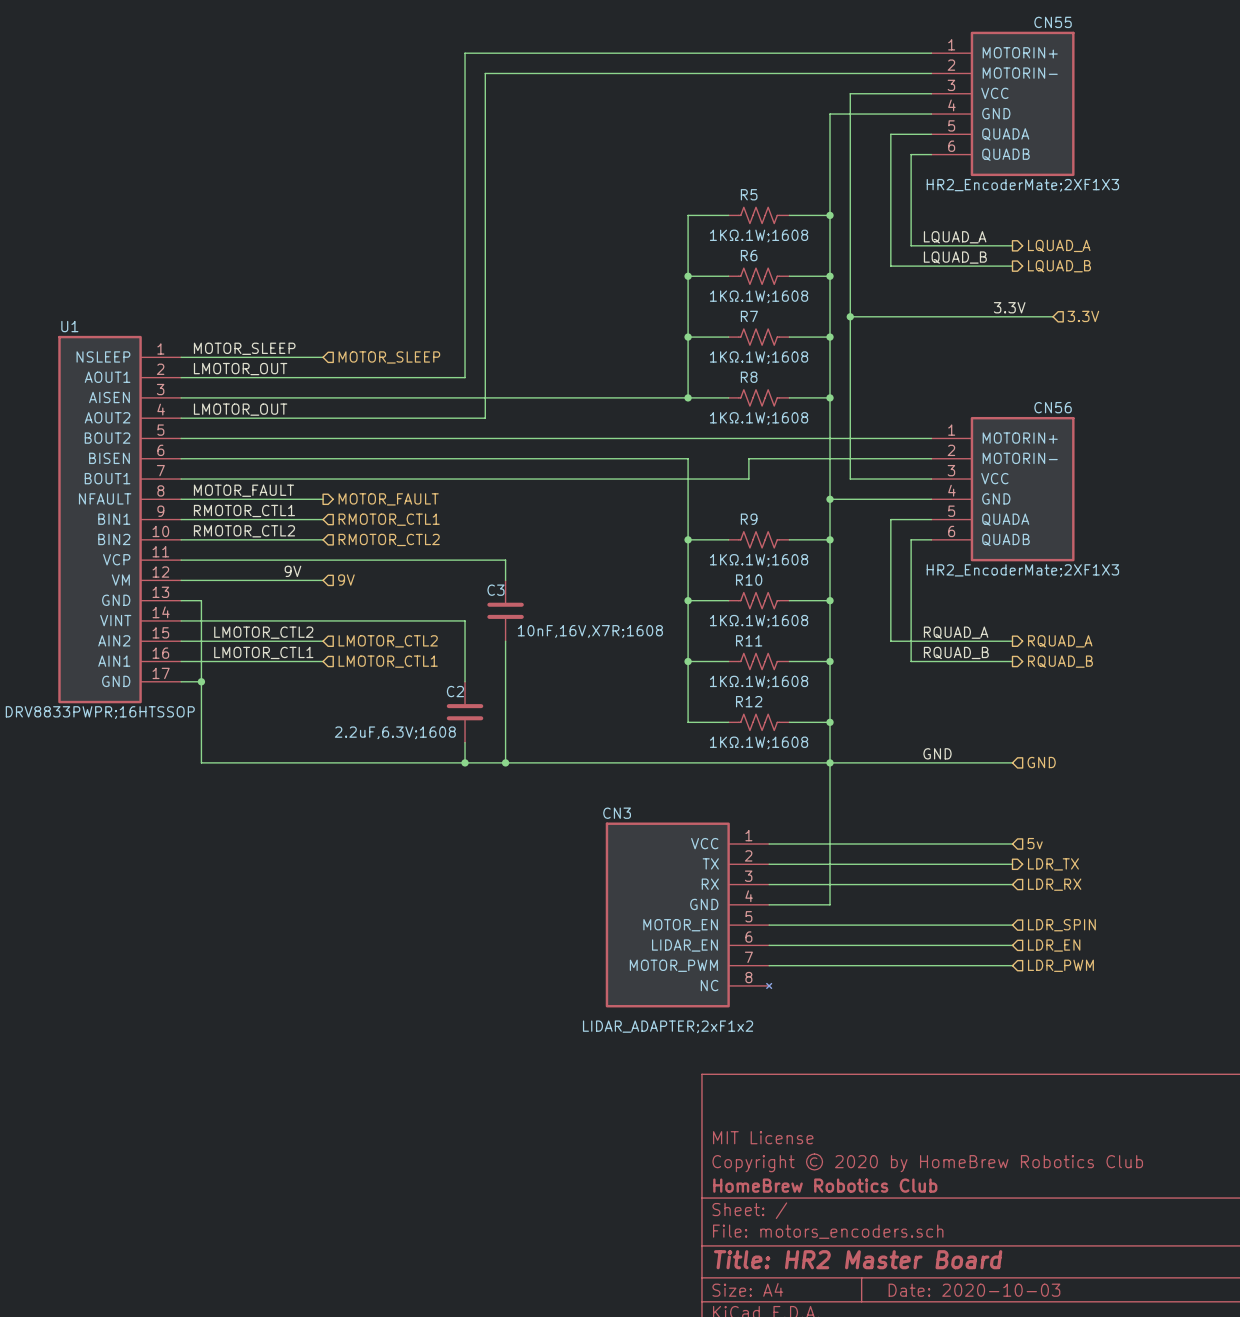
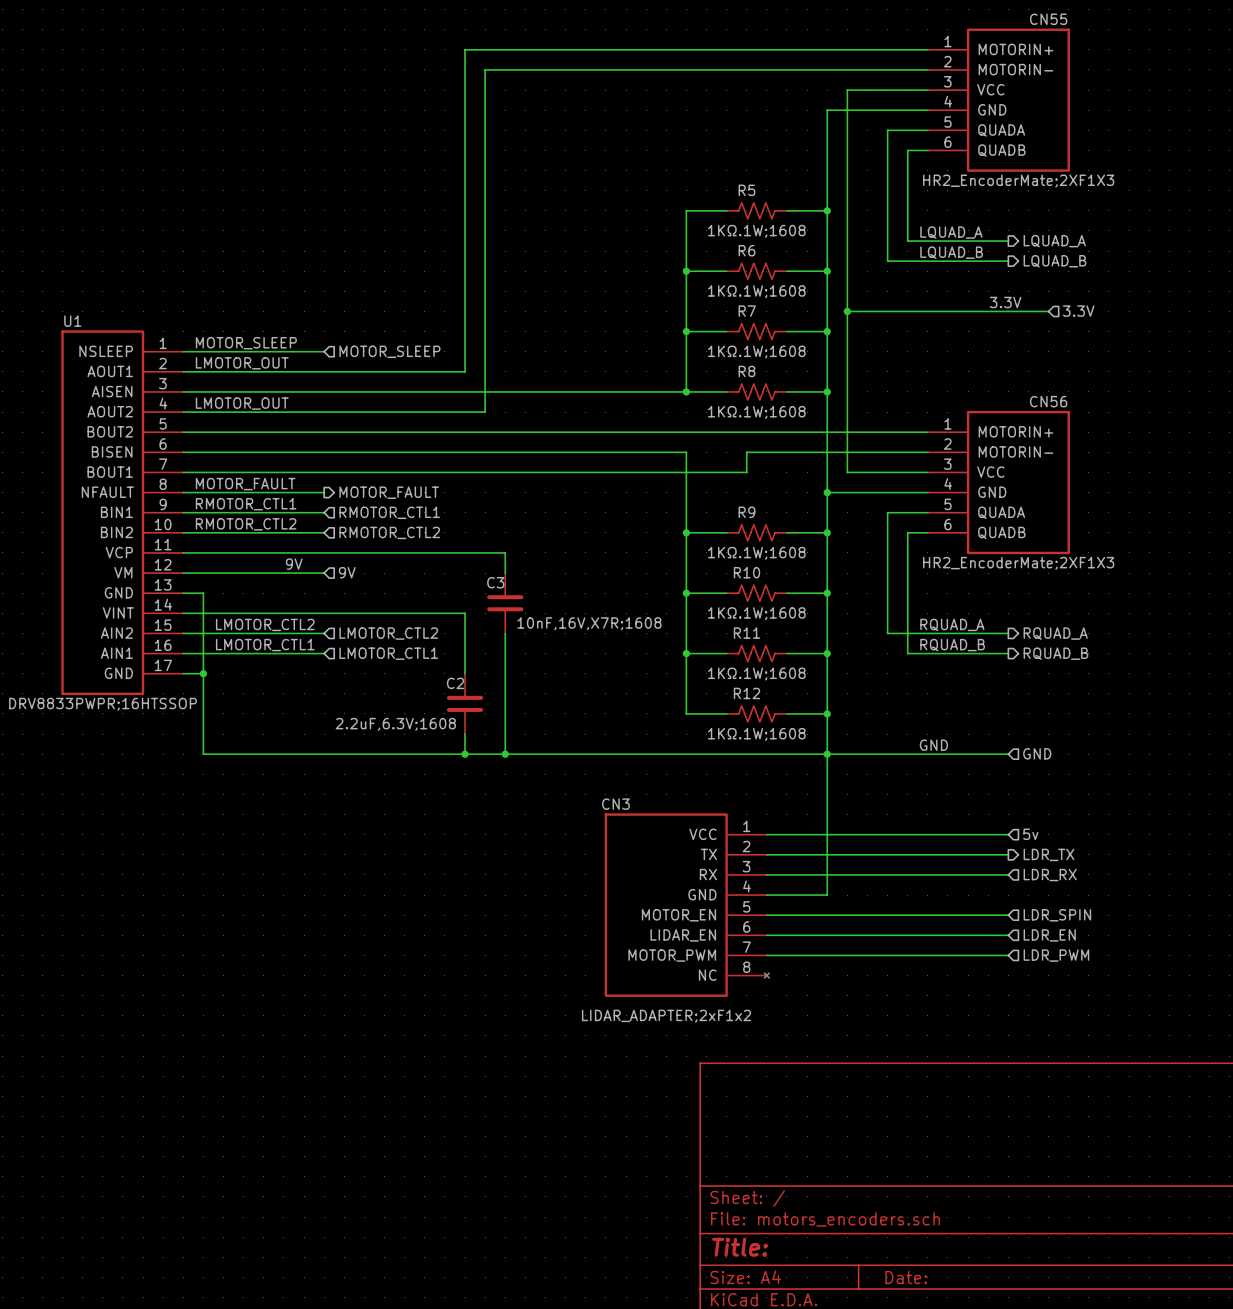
title block: MIT License (763, 1137) -> none
title block: Copyright © 2020 by HomeBrew Robotics Club (927, 1162) -> none
title block: HomeBrew Robotics Club (825, 1185) -> none
title block: Title: HR2 Master Board (858, 1259) -> Title: (740, 1247)
title block: Date: 2020-10-03 (974, 1290) -> Date: (906, 1277)

